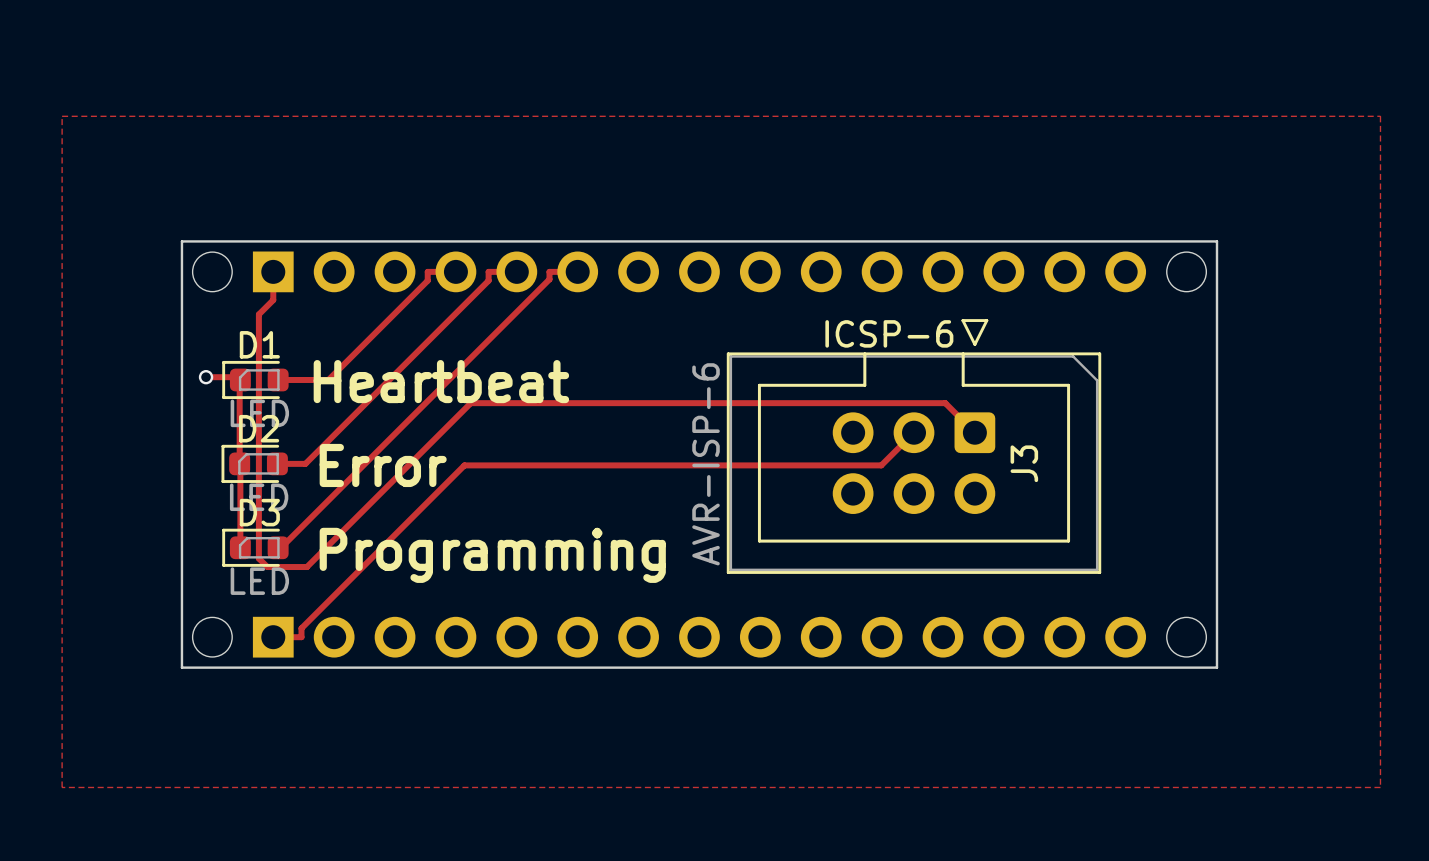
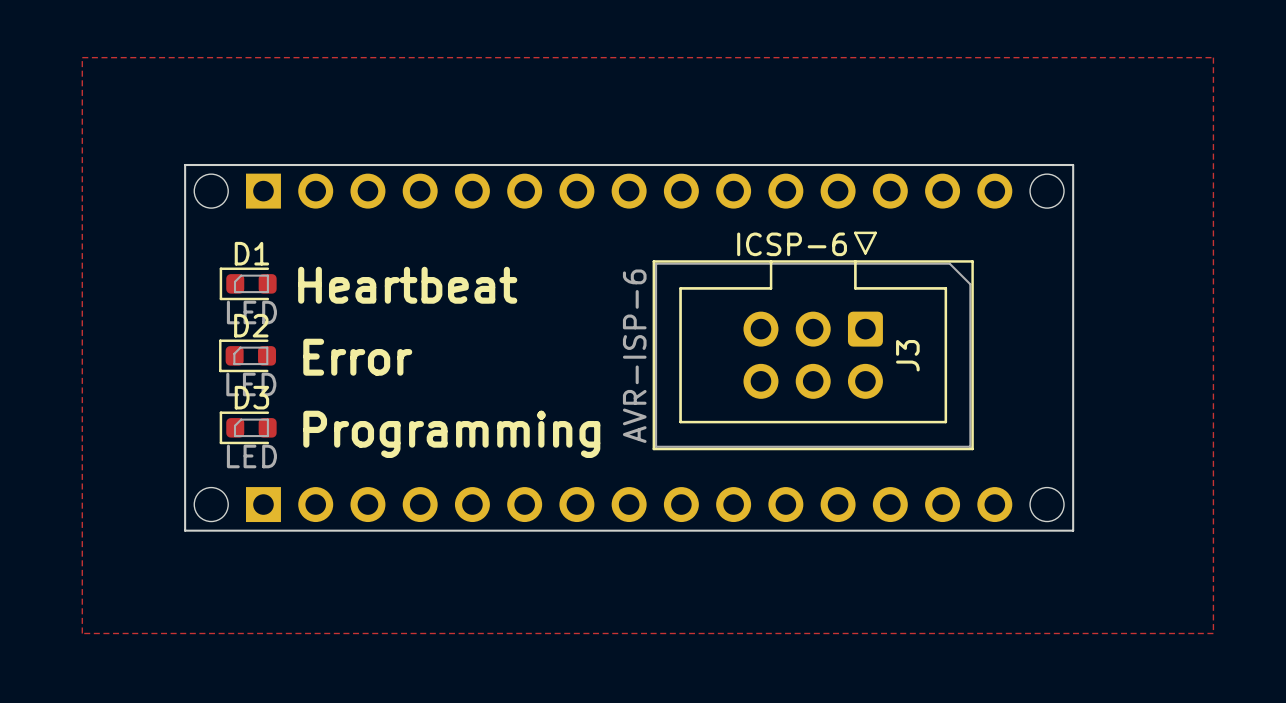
track: (273, 271) (273, 300) (258, 314) (258, 558) (267, 567) (306, 567) (470, 403) (945, 403) (974, 432) -> none
track: (455, 271) (427, 271) (427, 280) (328, 379) (278, 379) -> none
track: (516, 271) (488, 271) (488, 280) (305, 463) (277, 463) -> none
track: (577, 271) (549, 271) (549, 279) (281, 547) (278, 547) -> none
track: (206, 377) (236, 377) (239, 379) (240, 547) -> none
via: (206, 377) -> none
track: (914, 432) (881, 465) (464, 465) (301, 628) (301, 637) (273, 637) -> none

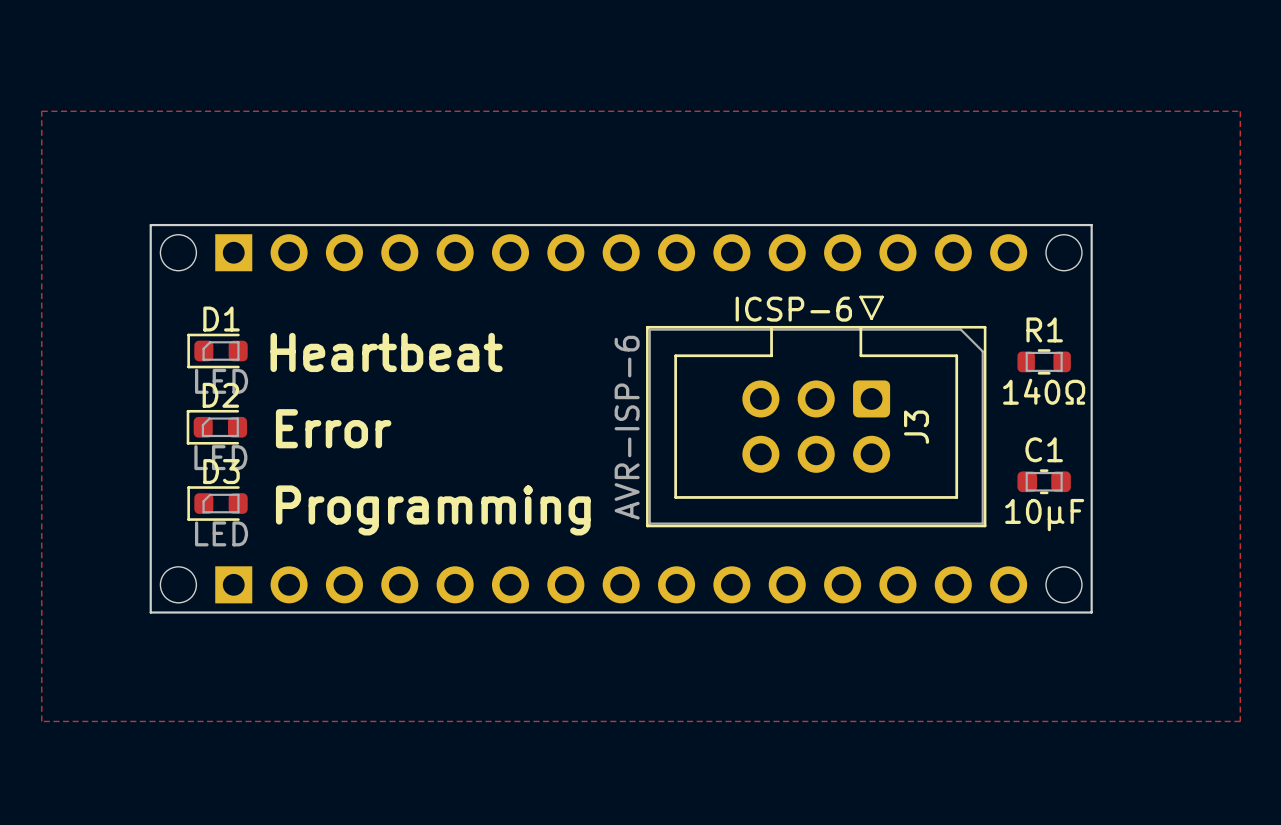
R1: none -> 140Ω (1044, 361)
C1: none -> 10µF (1044, 481)

